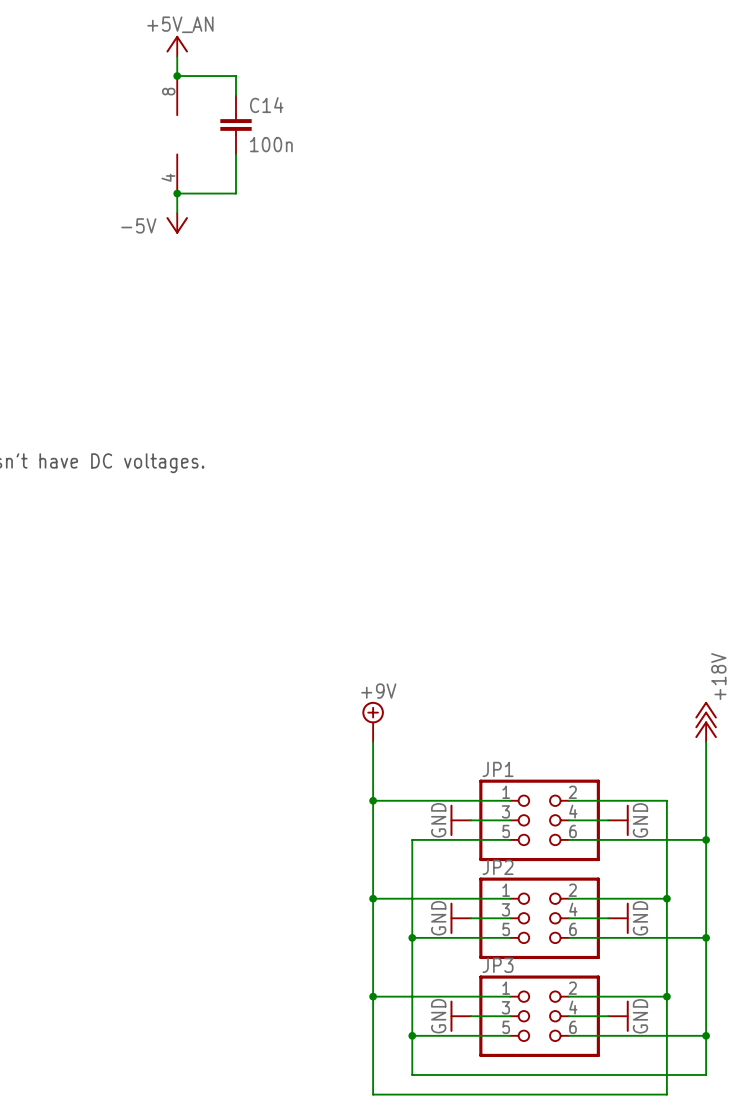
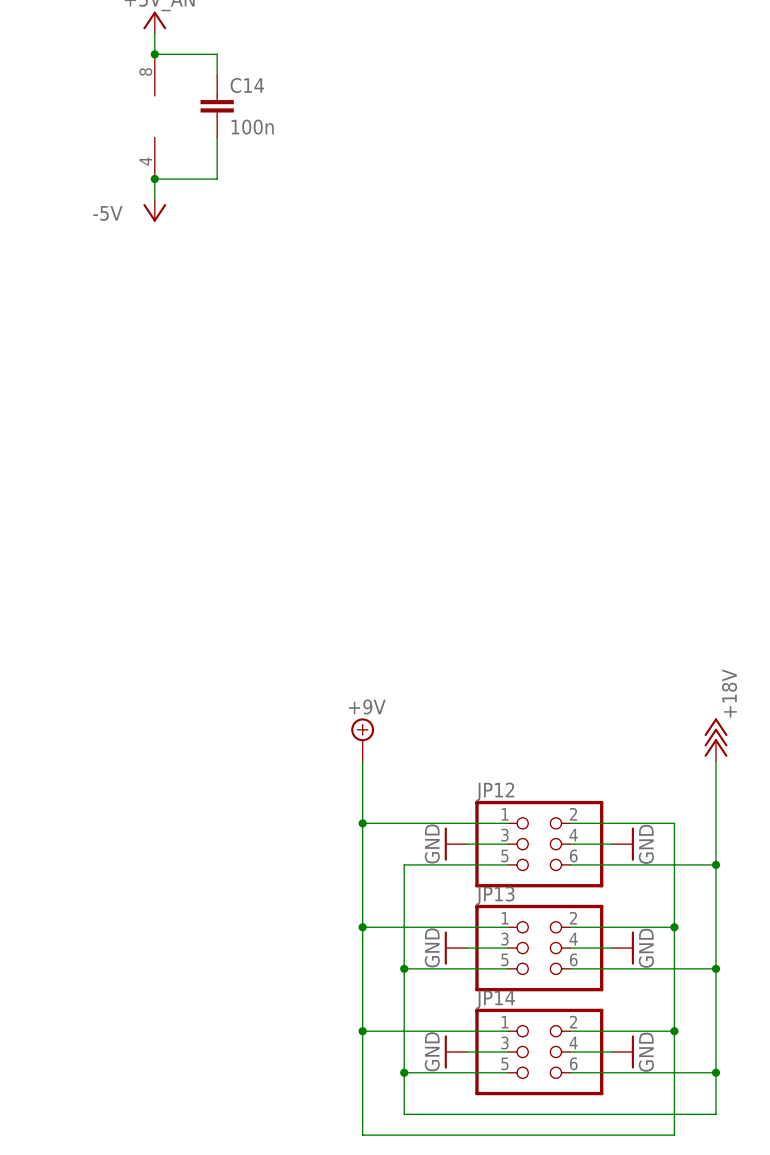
JP1 name: JP1 (498, 769) -> JP12 (495, 791)
JP2 name: JP2 (498, 867) -> JP13 (495, 895)
JP3 name: JP3 (498, 965) -> JP14 (495, 999)

